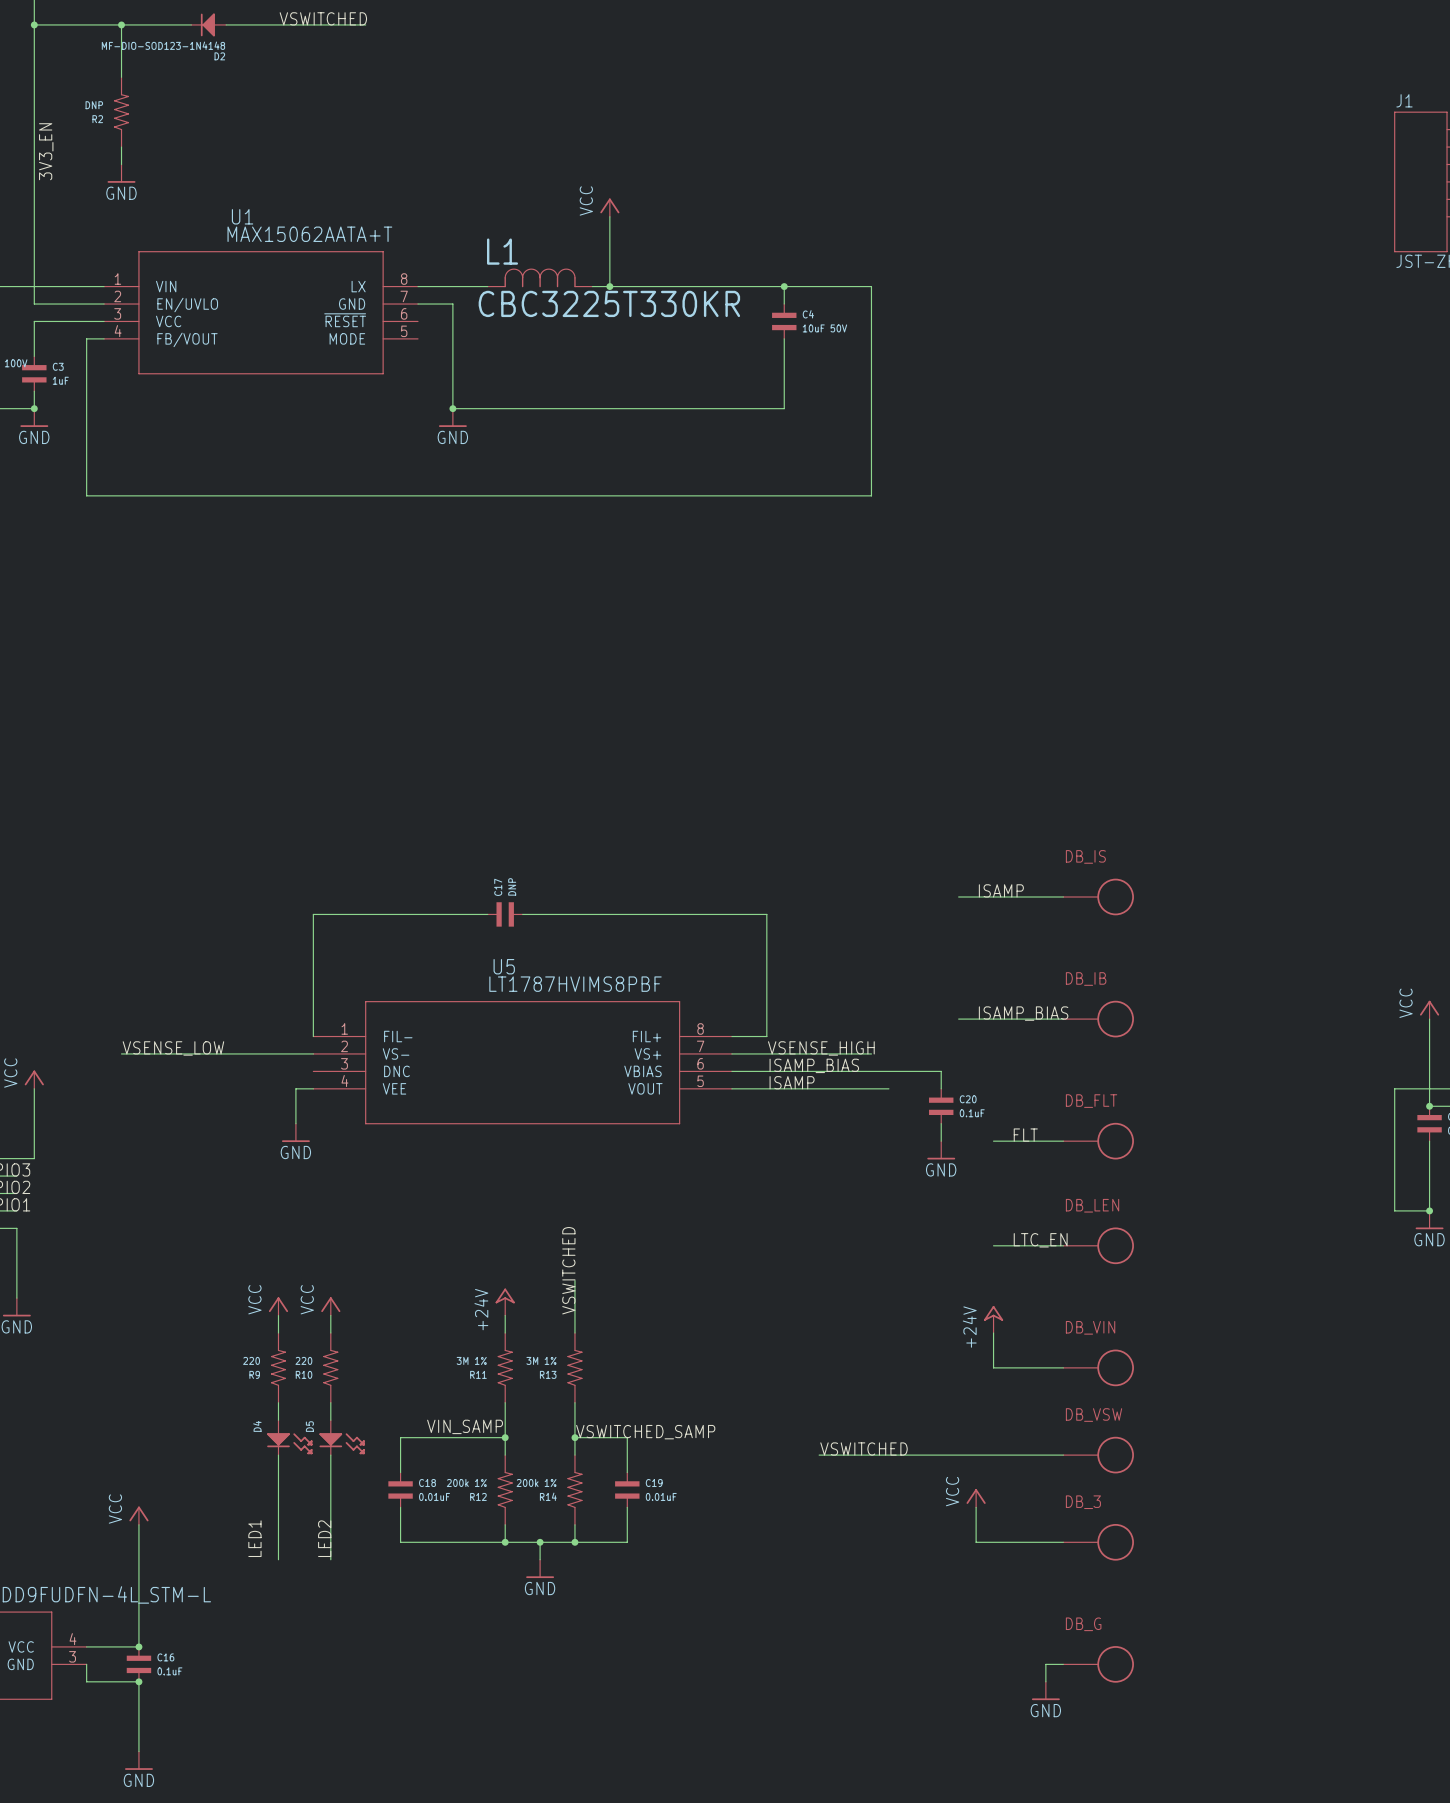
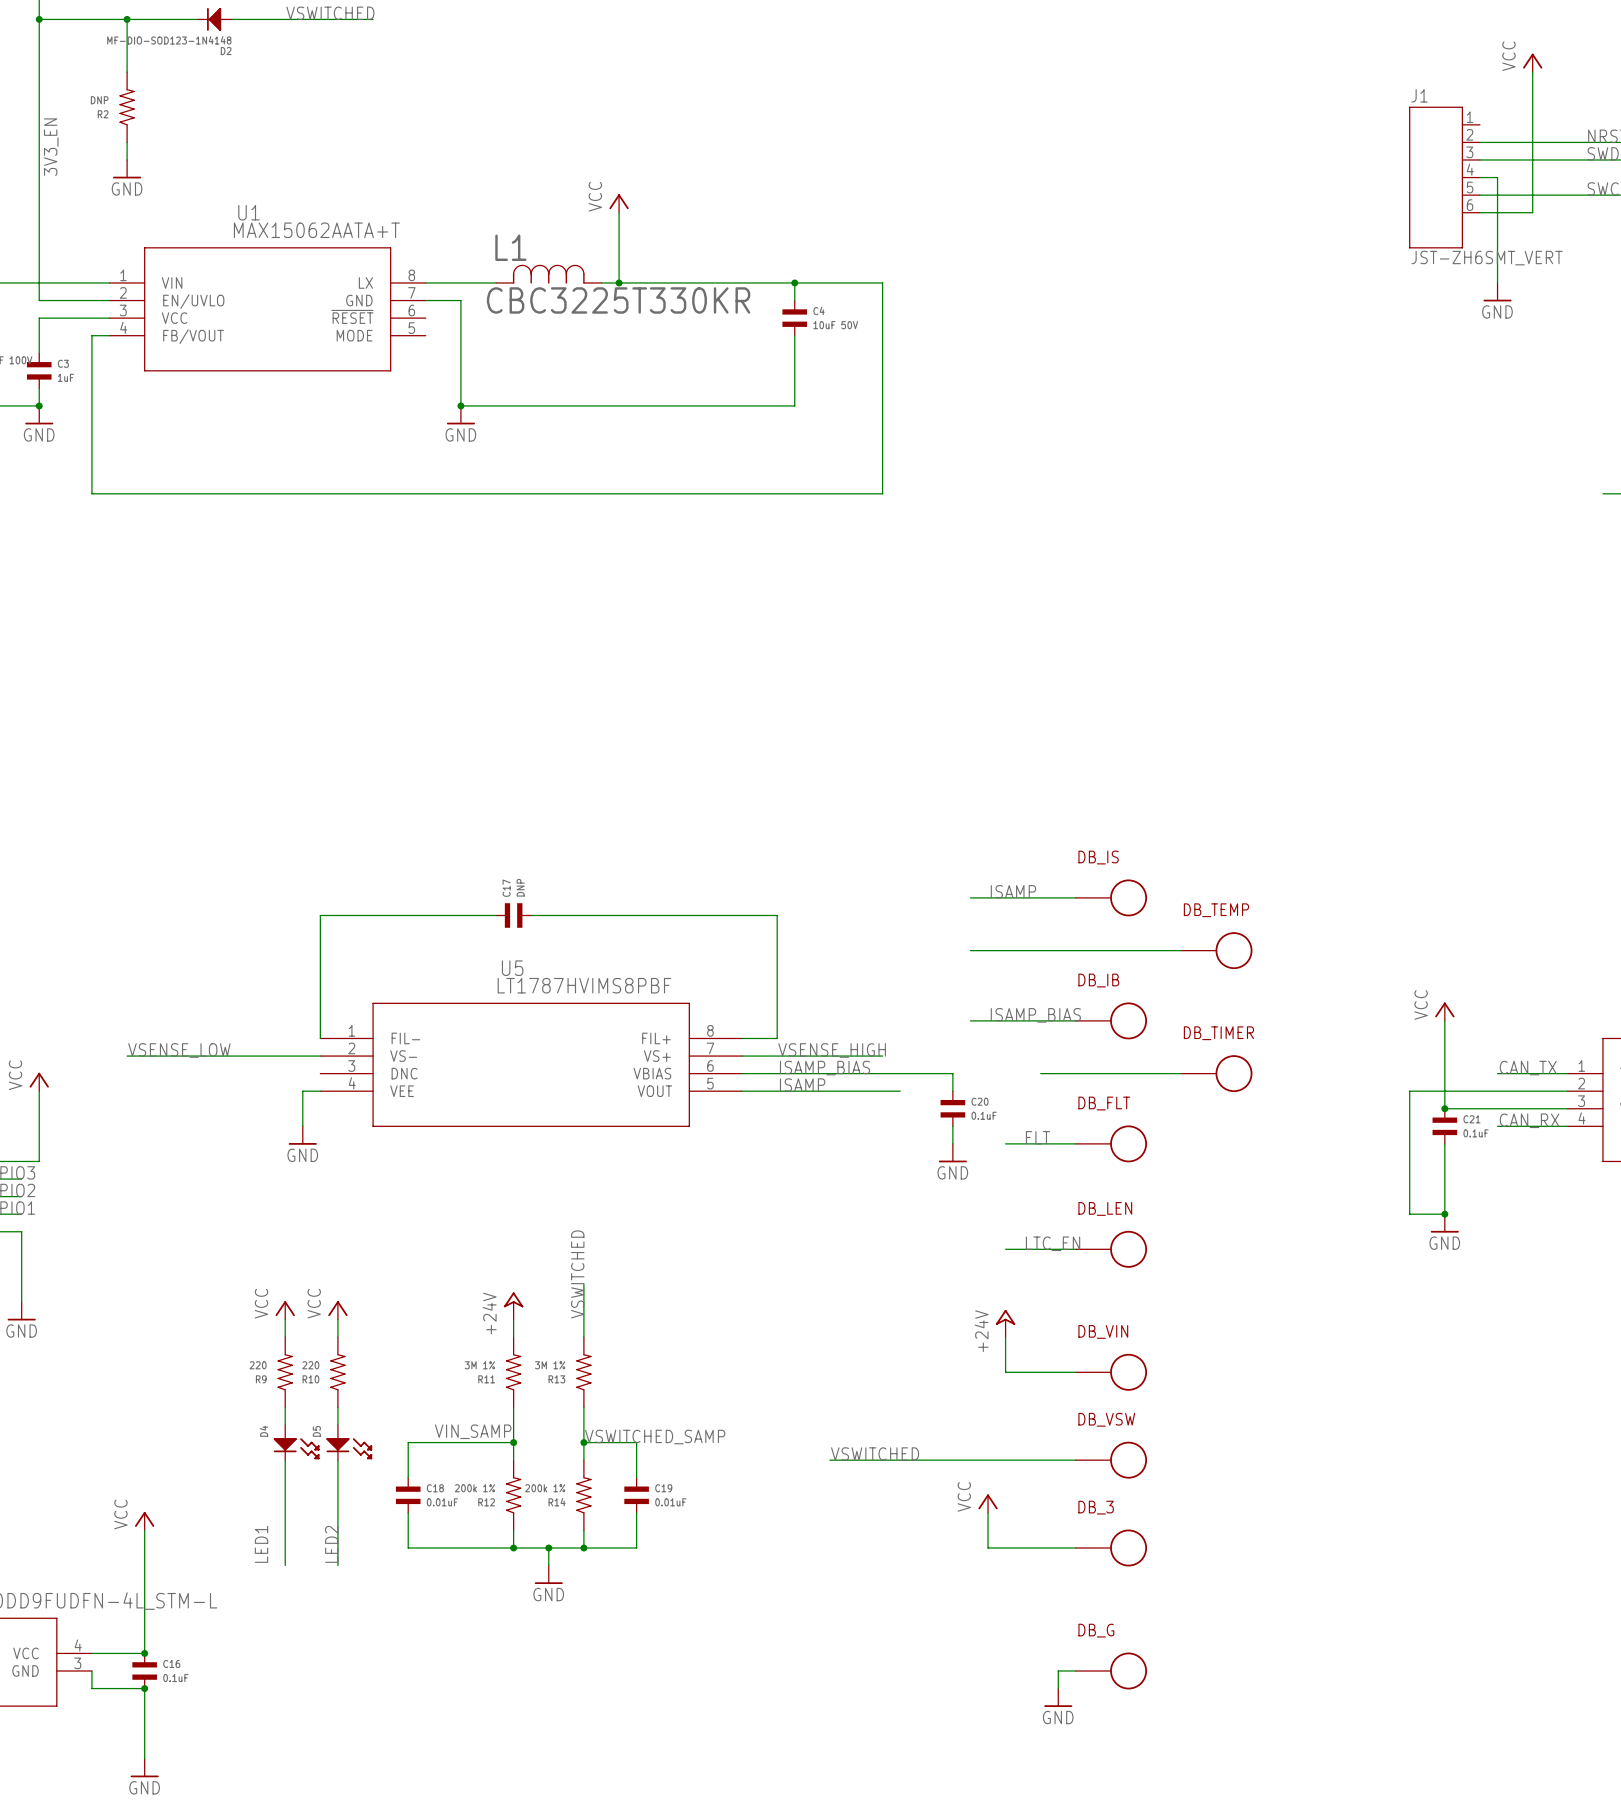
wire: none -> (970, 950) (1181, 950)
DB_TEMP: none -> (1216, 950)
wire: none -> (1040, 1073) (1181, 1073)
DB_TIMER: none -> (1216, 1073)

